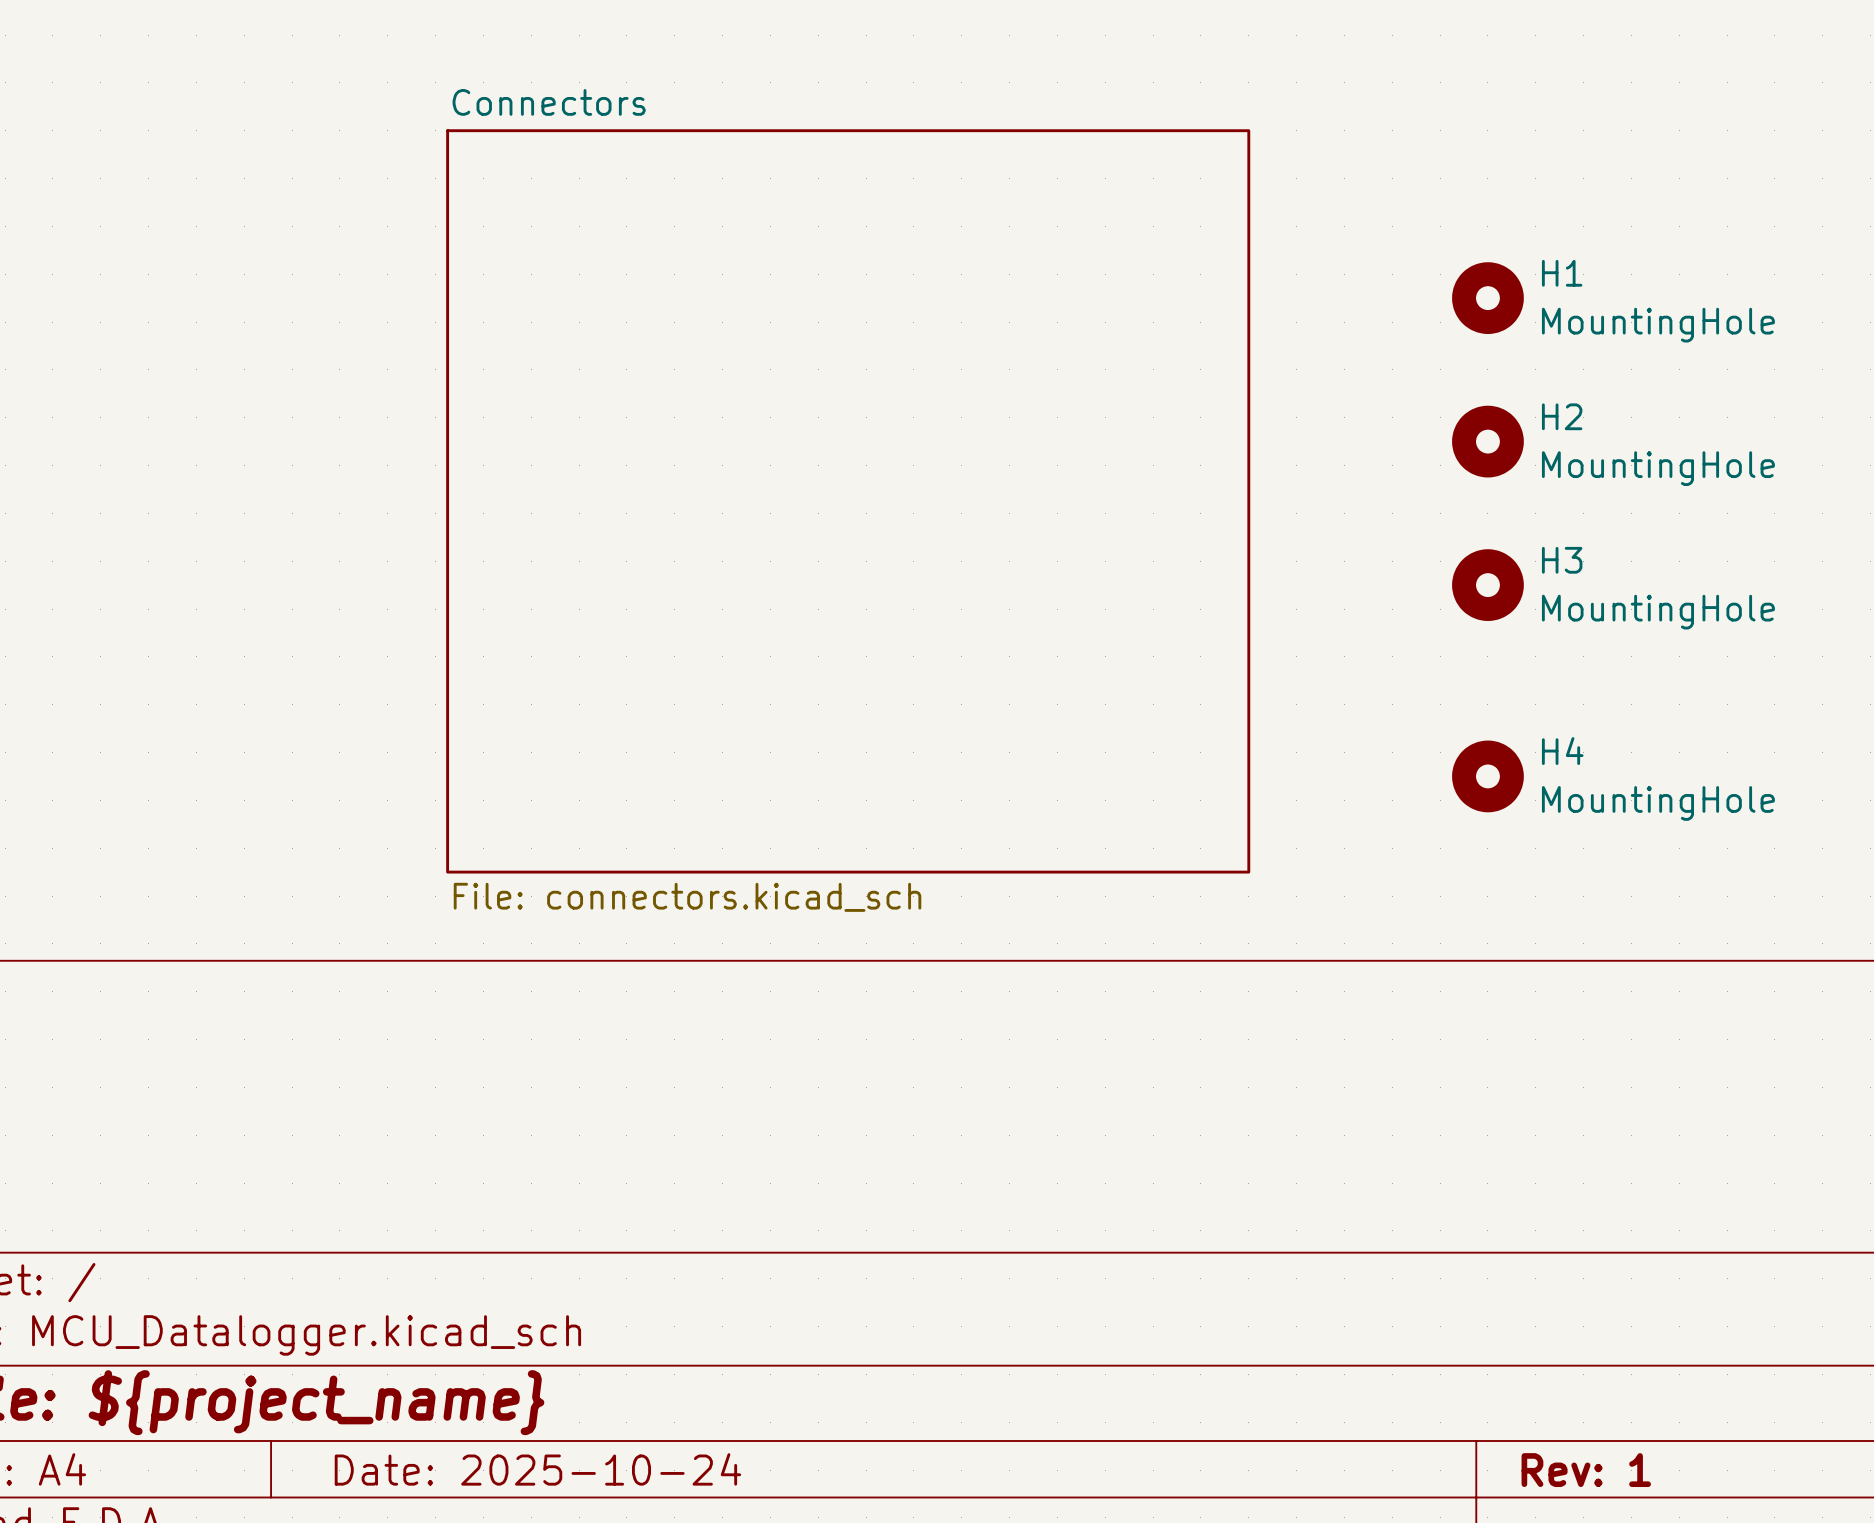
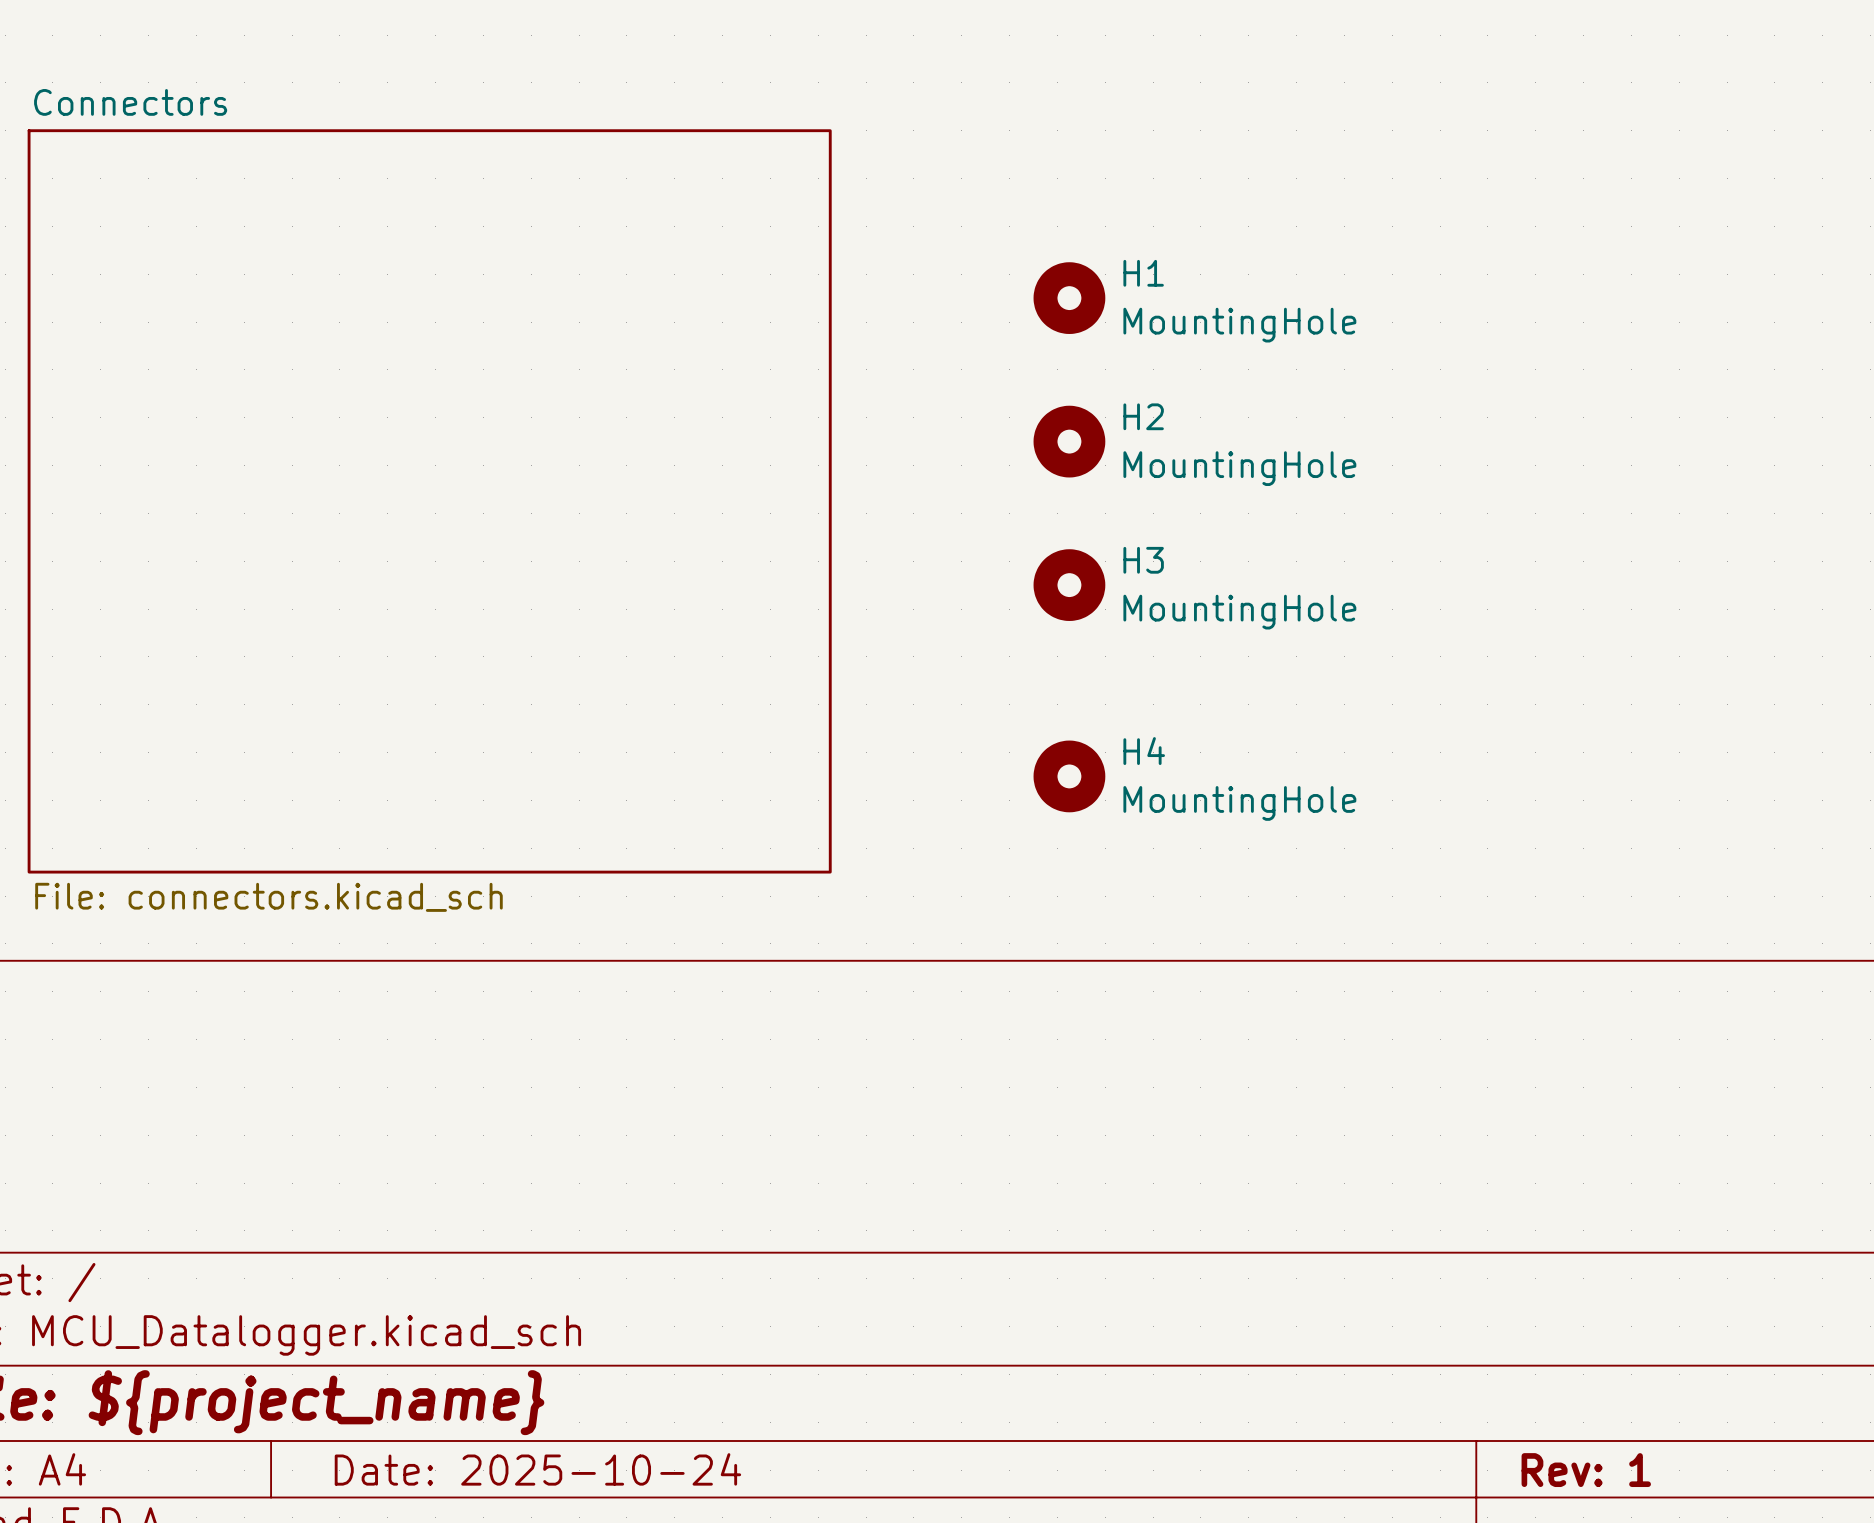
H1 position: (1487, 298) -> (1069, 298)
H2 position: (1487, 441) -> (1069, 441)
sheet Connectors position: (848, 501) -> (429, 501)
H3 position: (1487, 585) -> (1069, 585)
H4 position: (1487, 776) -> (1069, 776)

